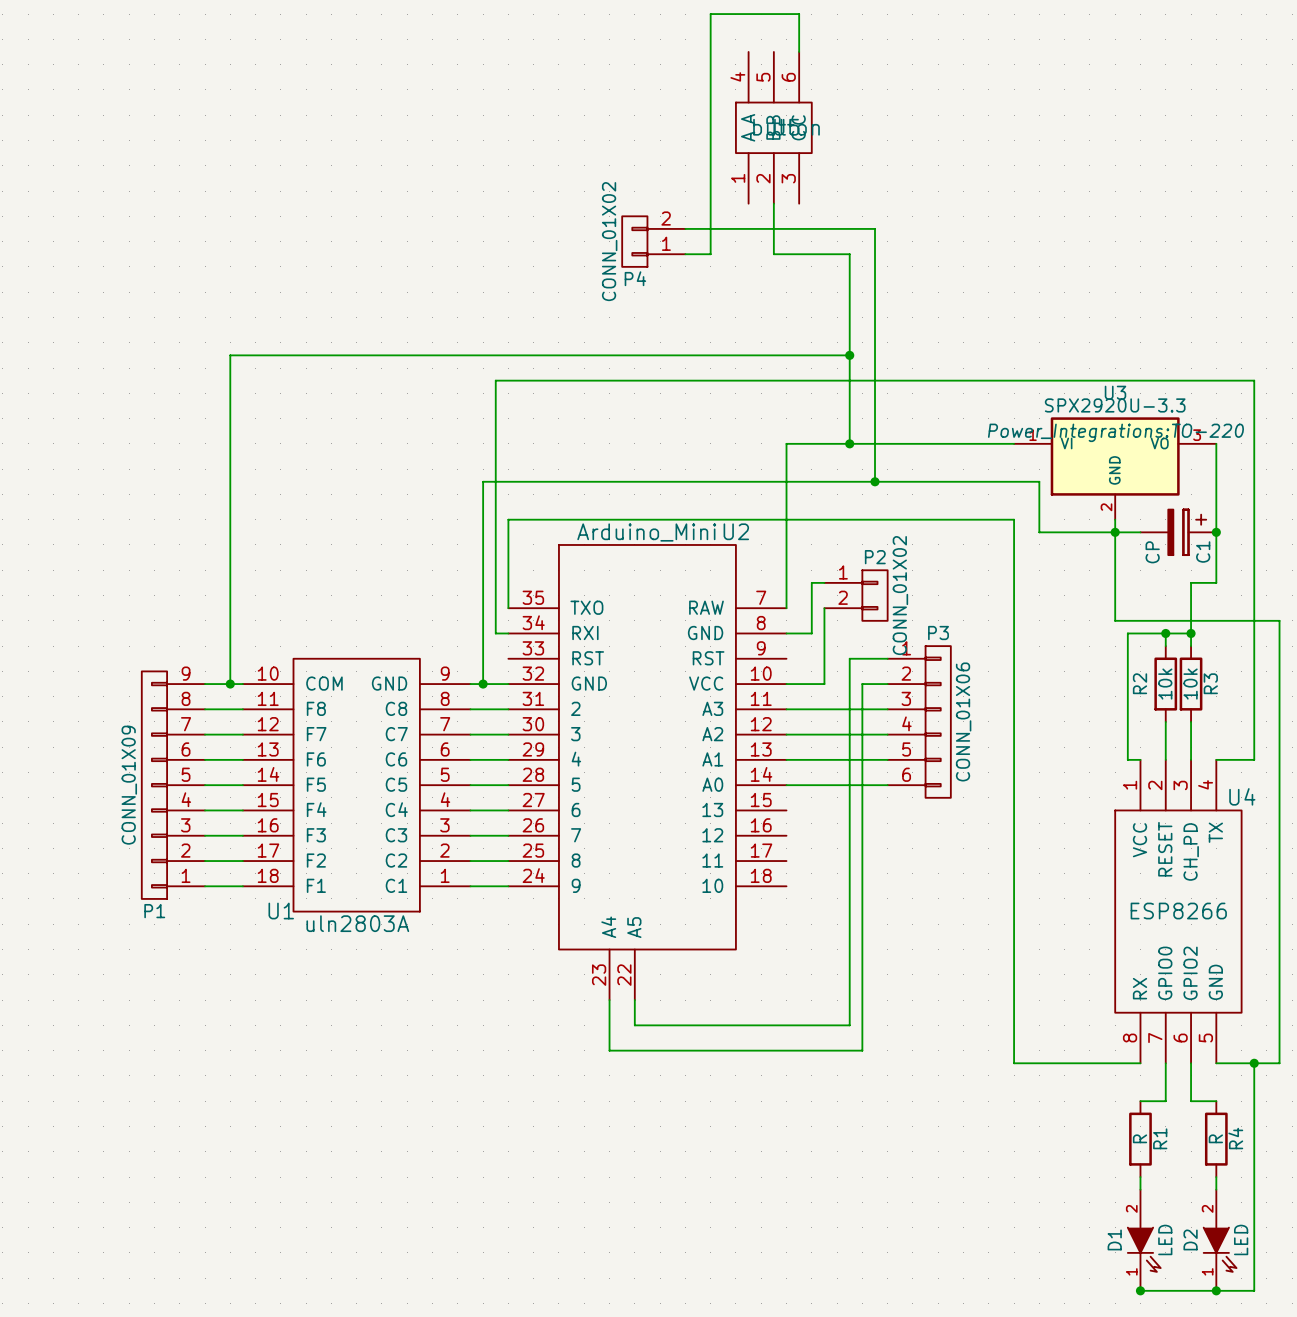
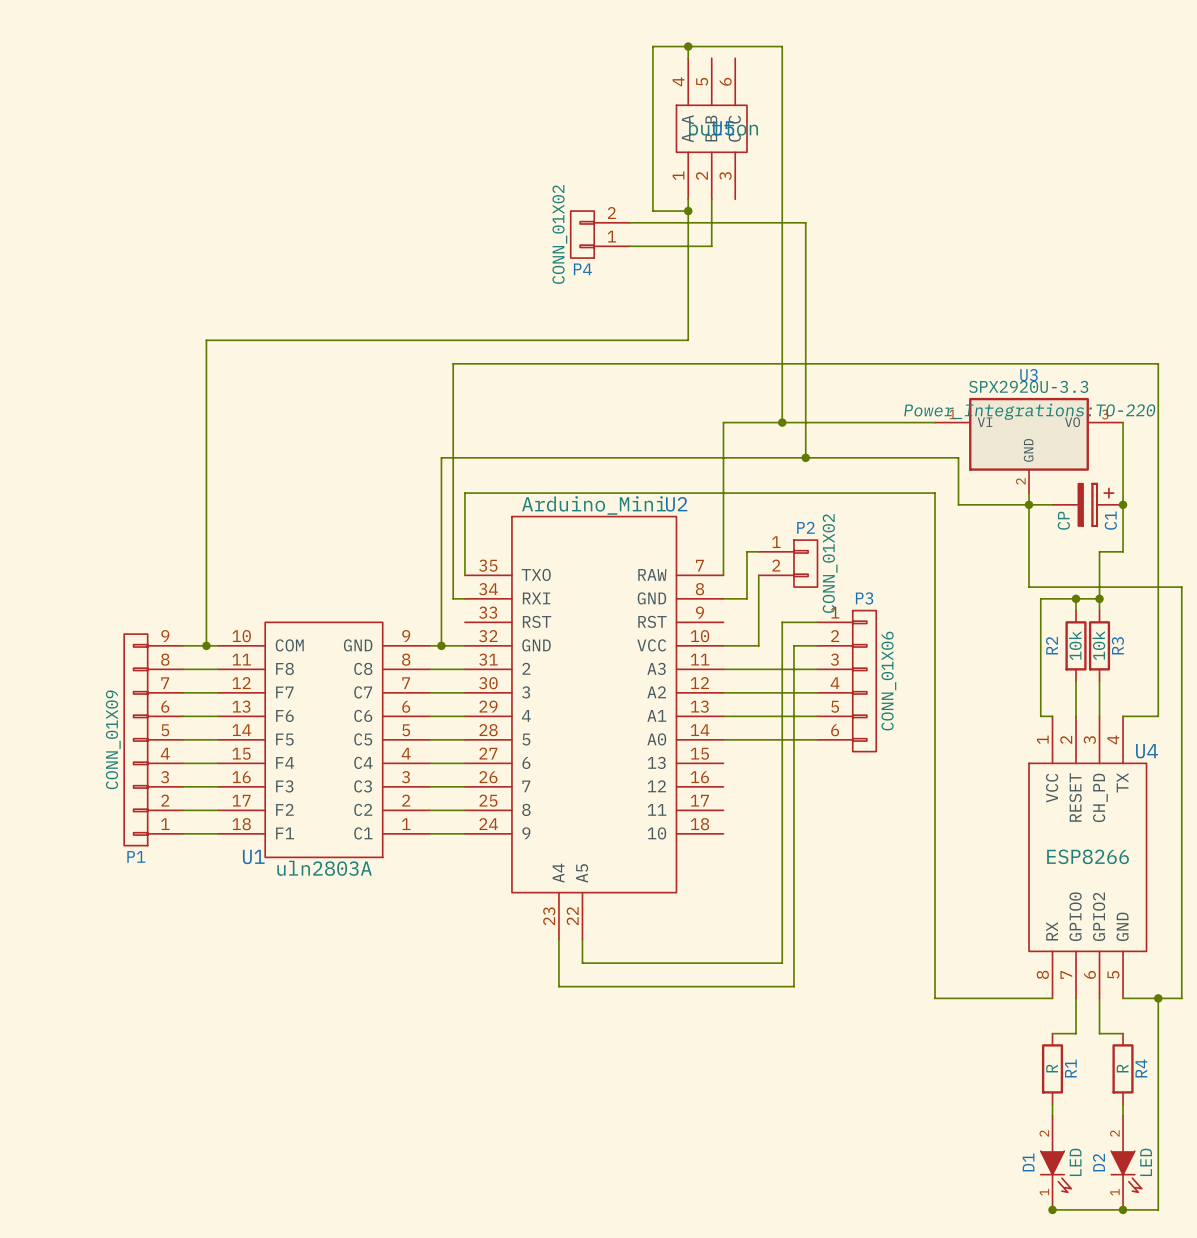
wire: (710, 39) (710, 14) (799, 14) (799, 51) -> (652, 46) (782, 46) (782, 246)
wire: none -> (688, 46) (688, 58)
junction: none -> (688, 46)
wire: (710, 216) (710, 254) -> (652, 211) (688, 211)
junction: none -> (688, 211)
wire: (773, 254) (849, 254) -> (711, 246) (652, 246)
wire: (748, 355) (849, 355) -> (688, 340) (688, 199)
junction: (849, 355) -> none

